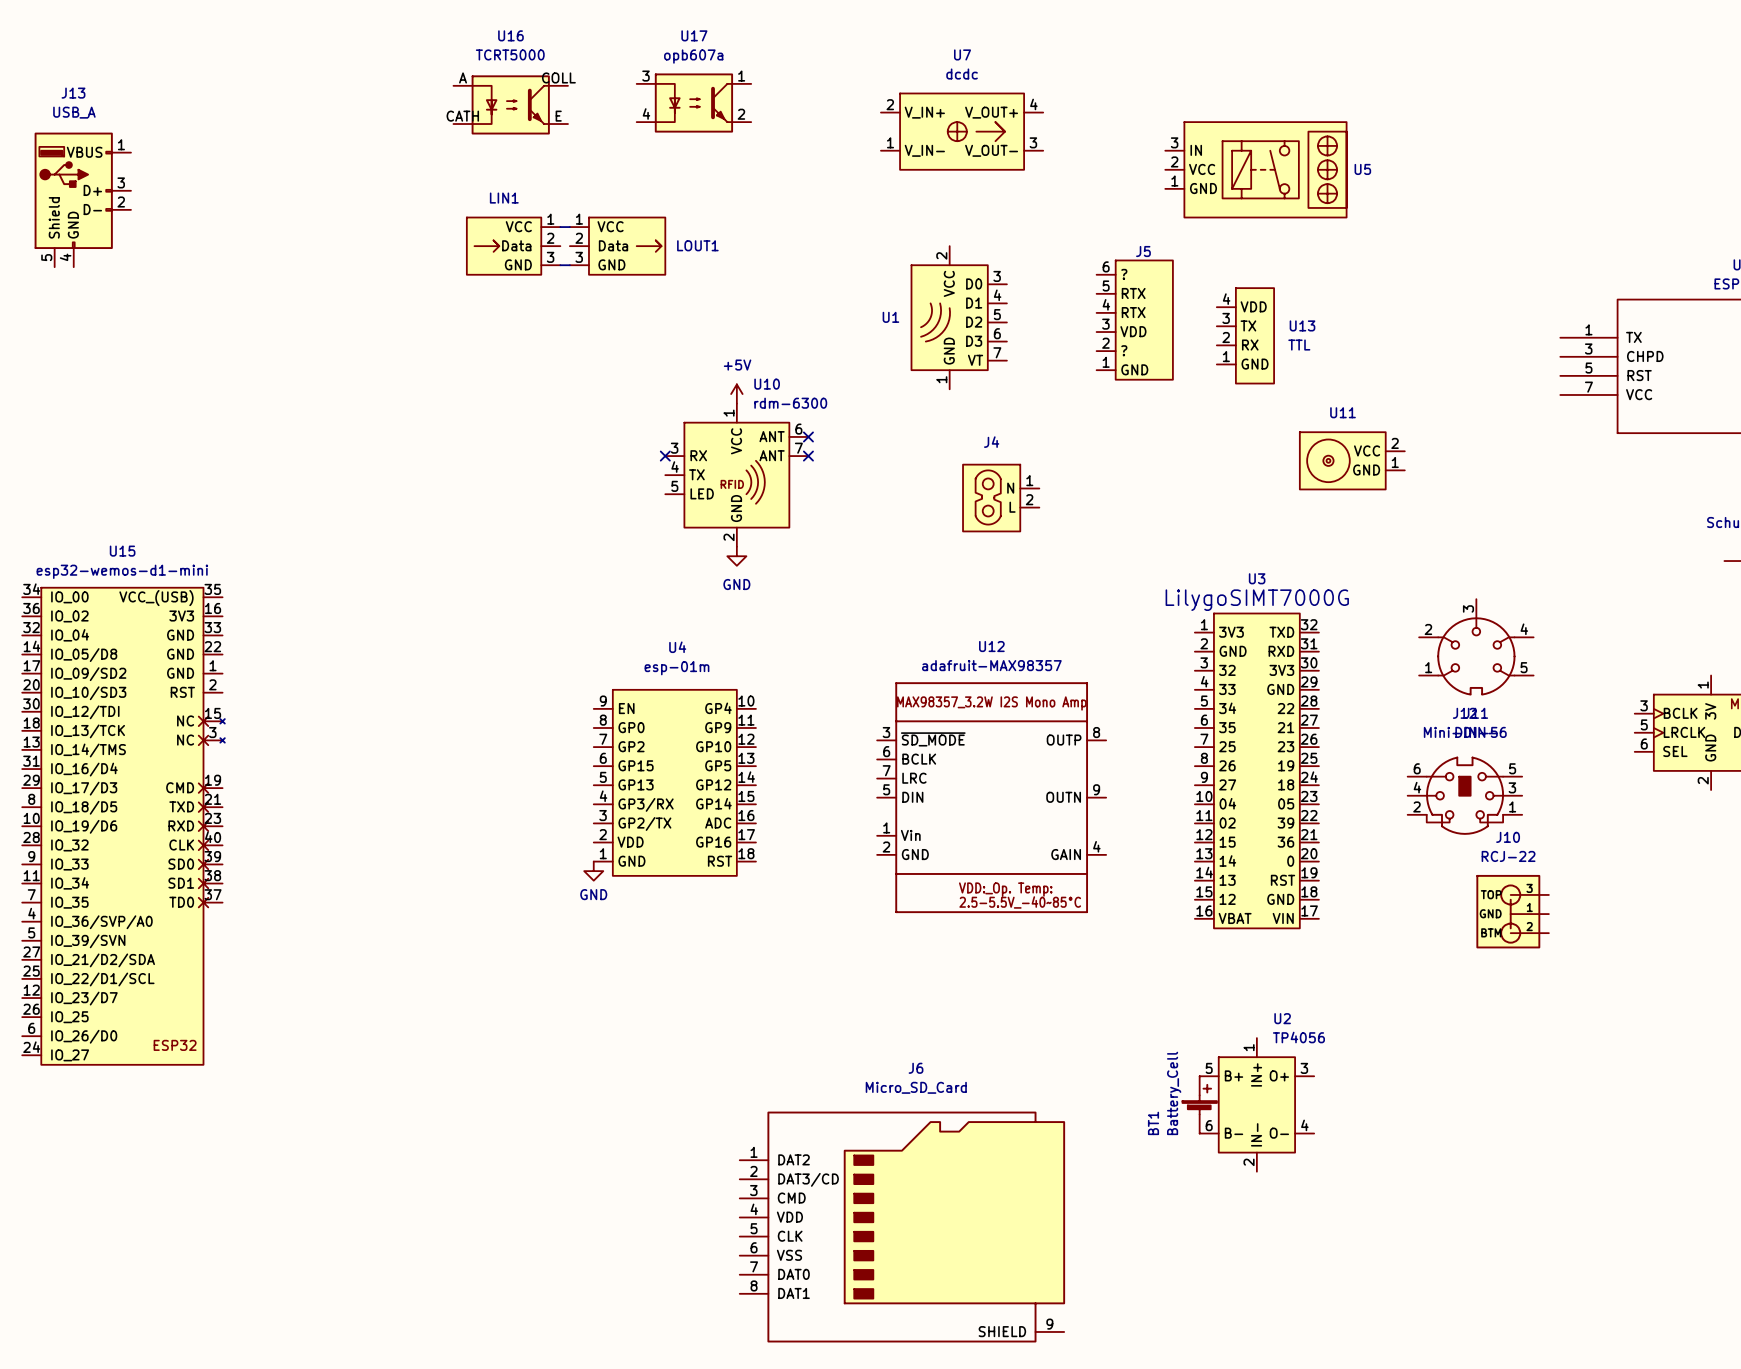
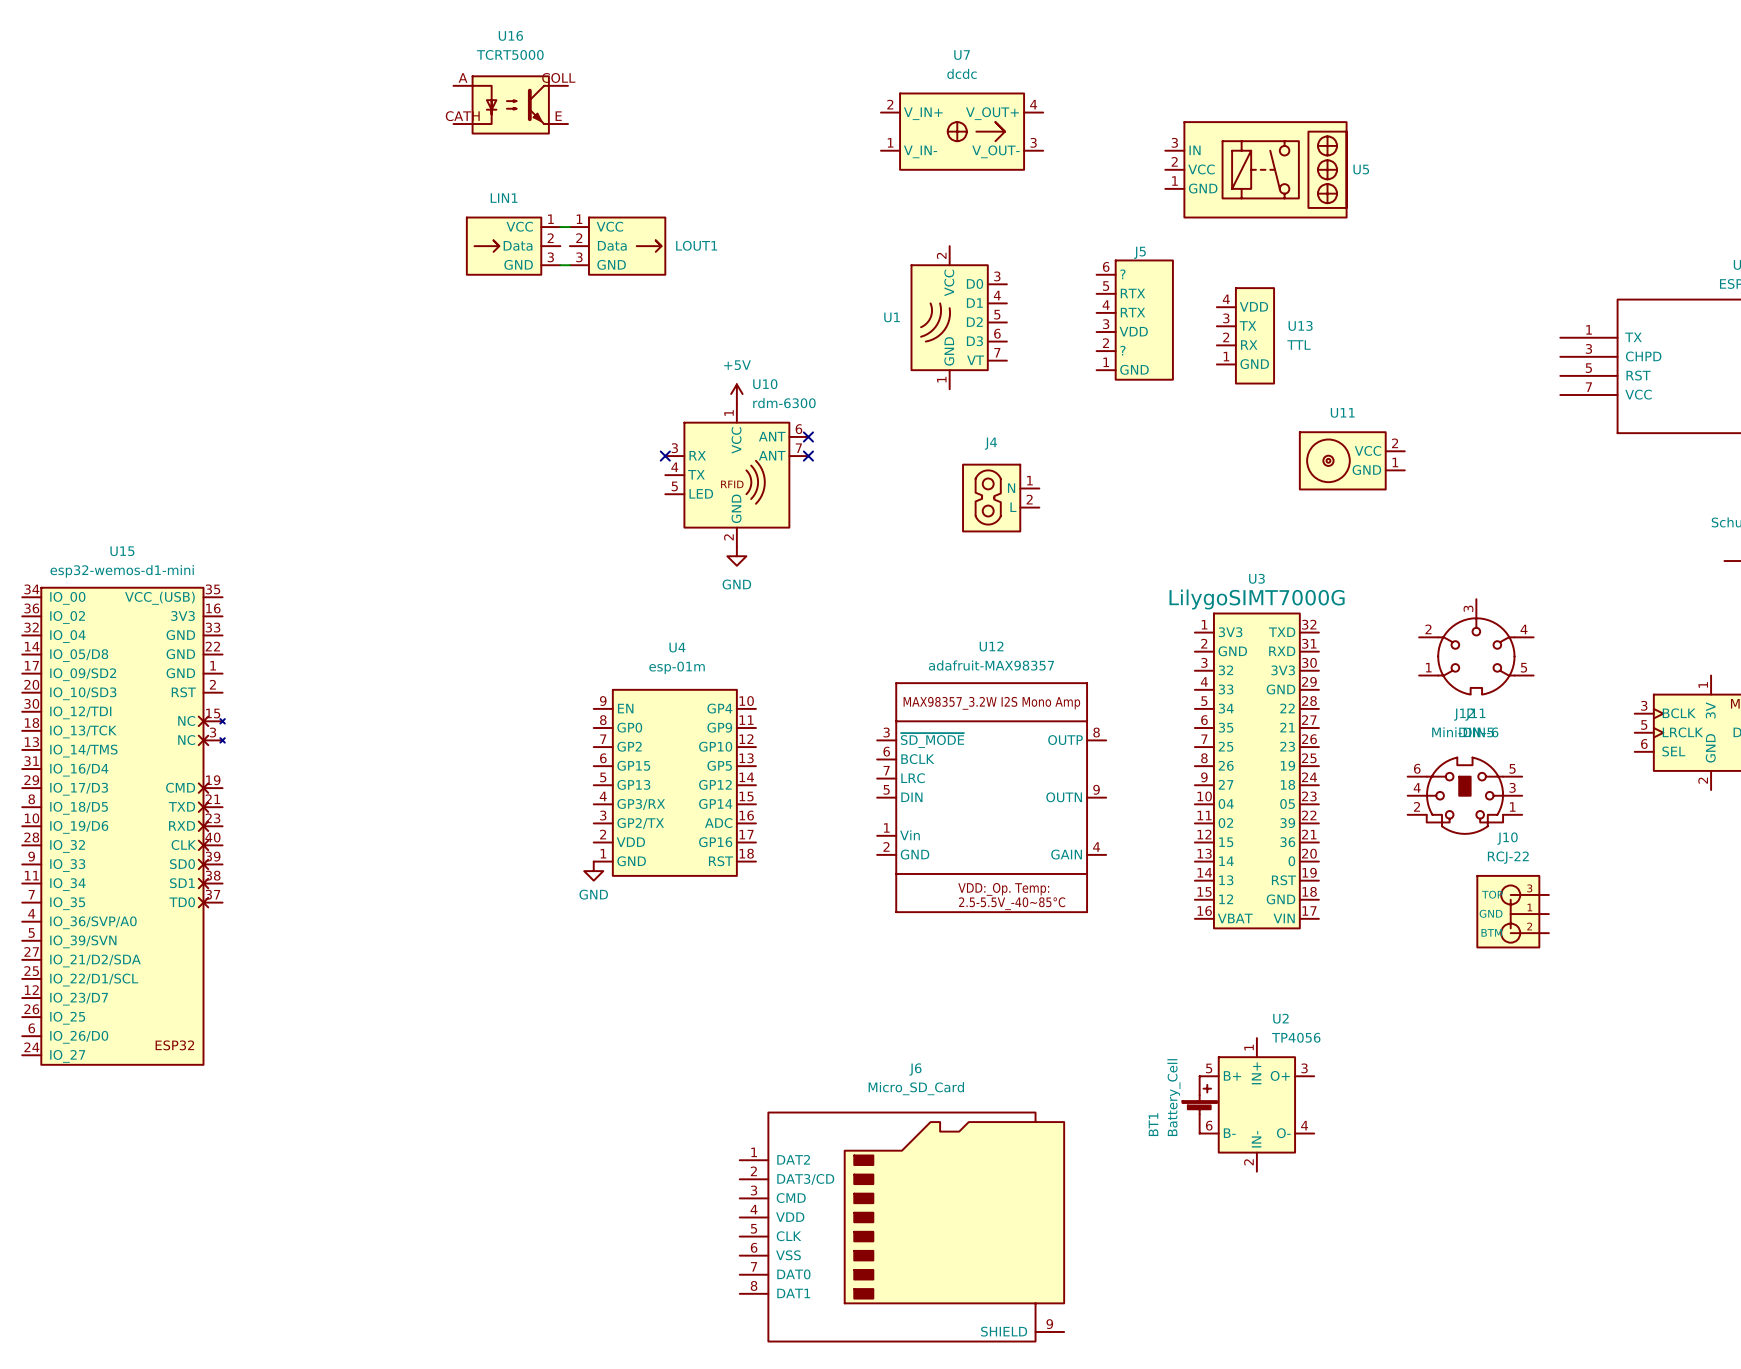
U17: opb607a (693, 103) -> none
J13: USB_A (82, 199) -> none

